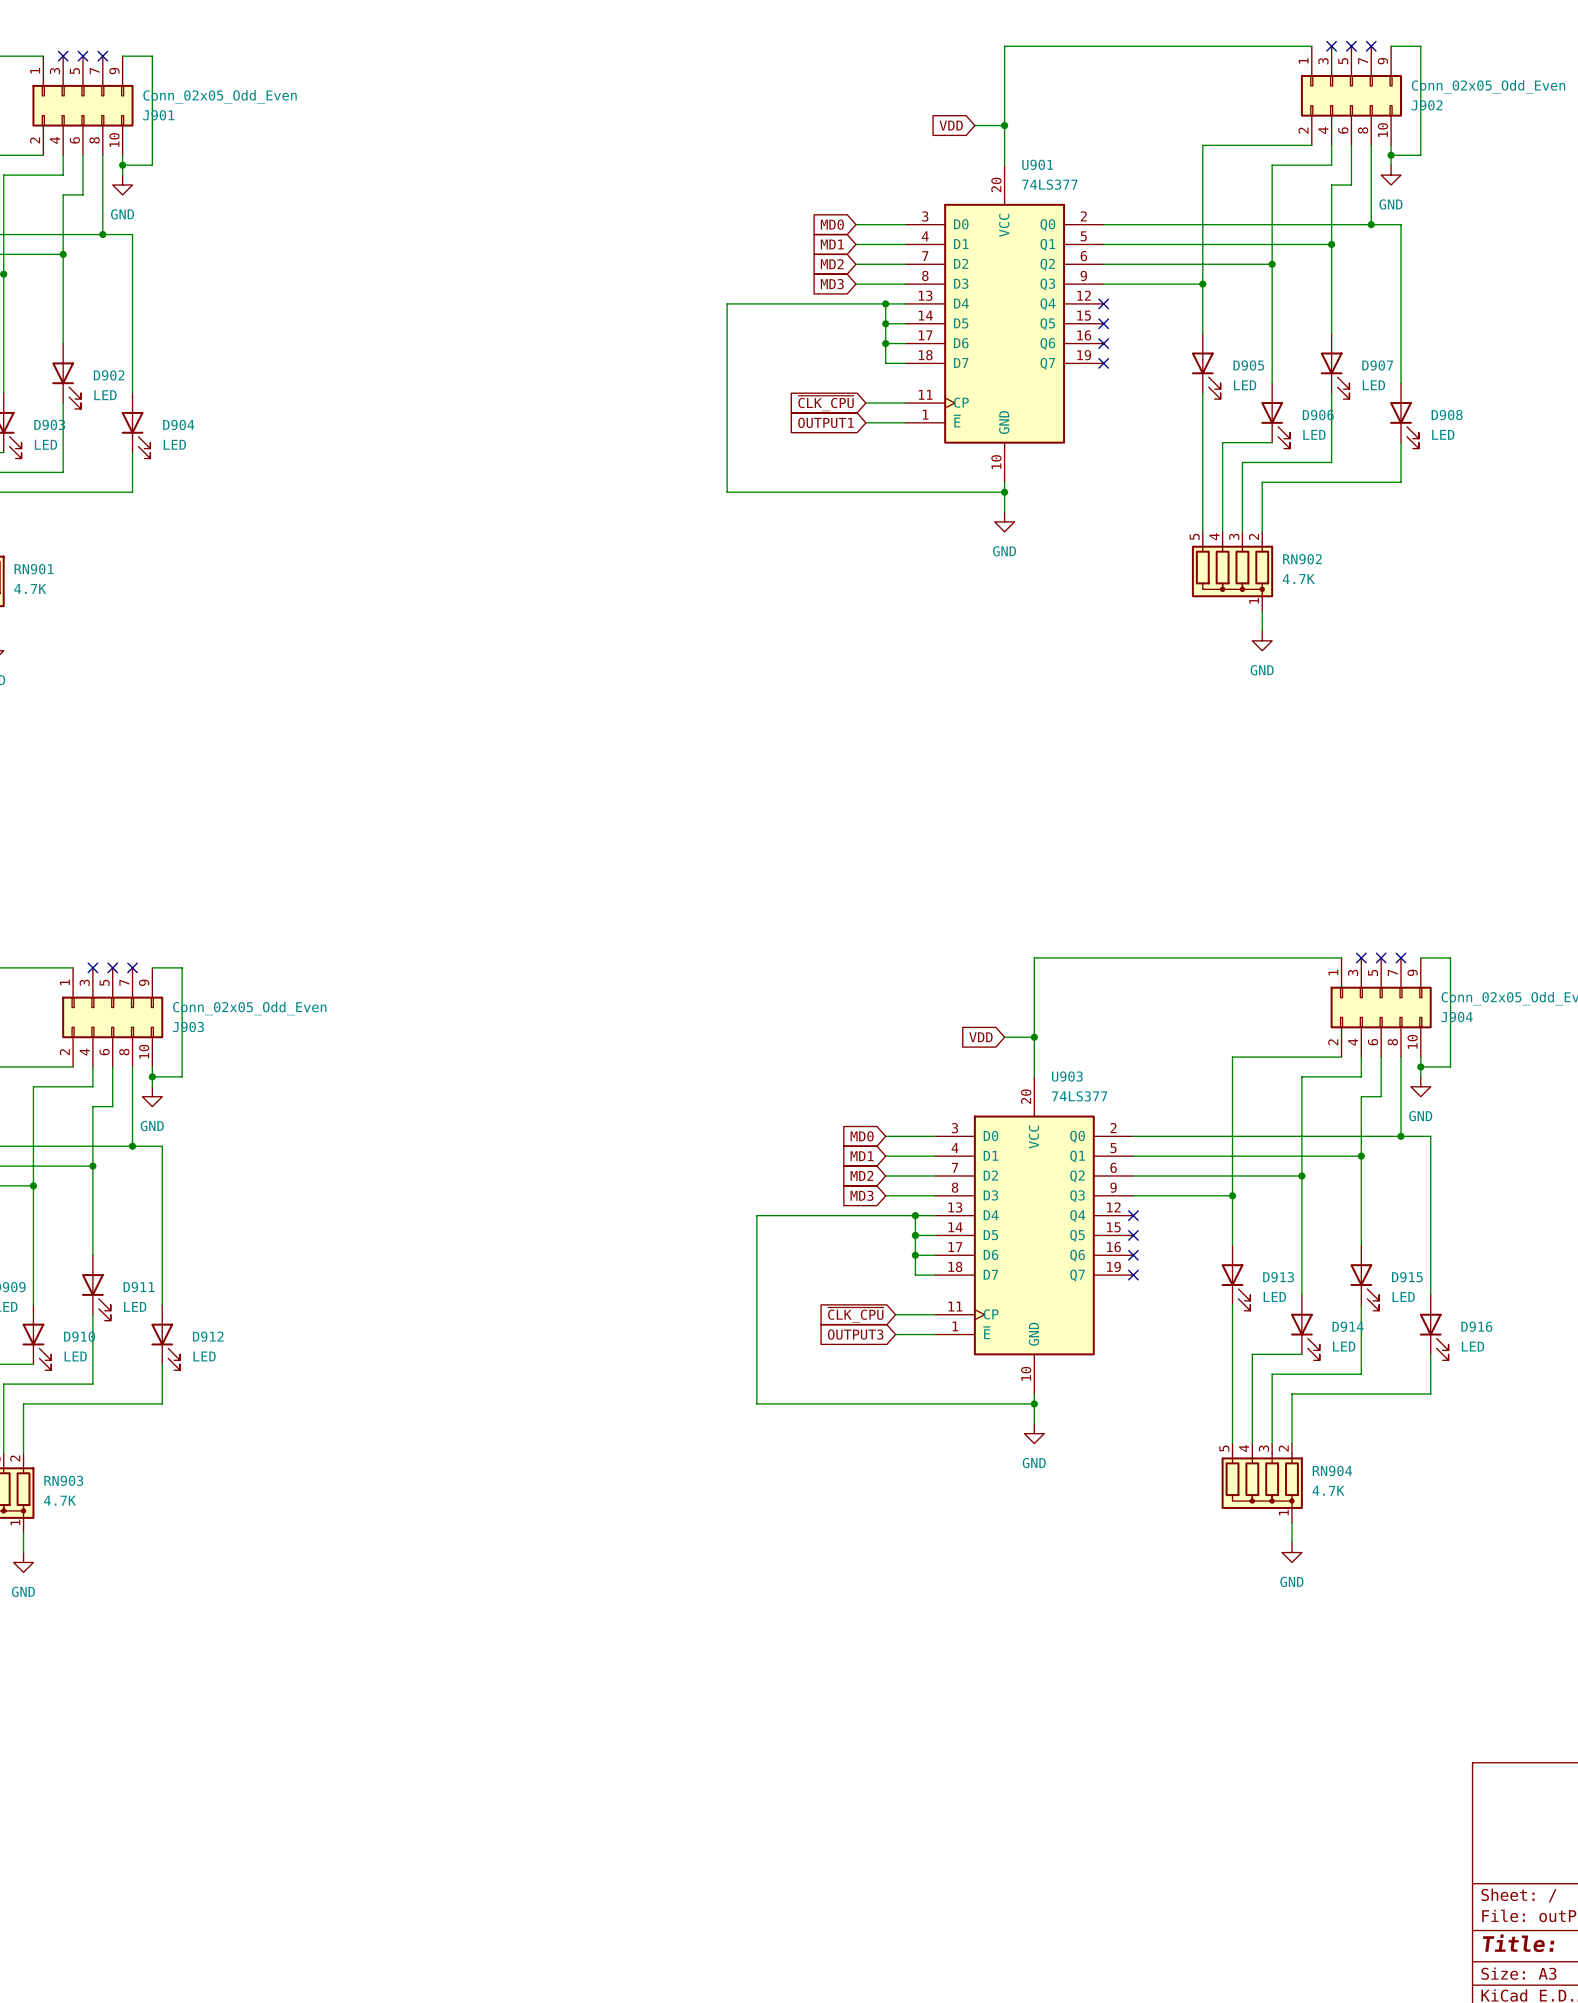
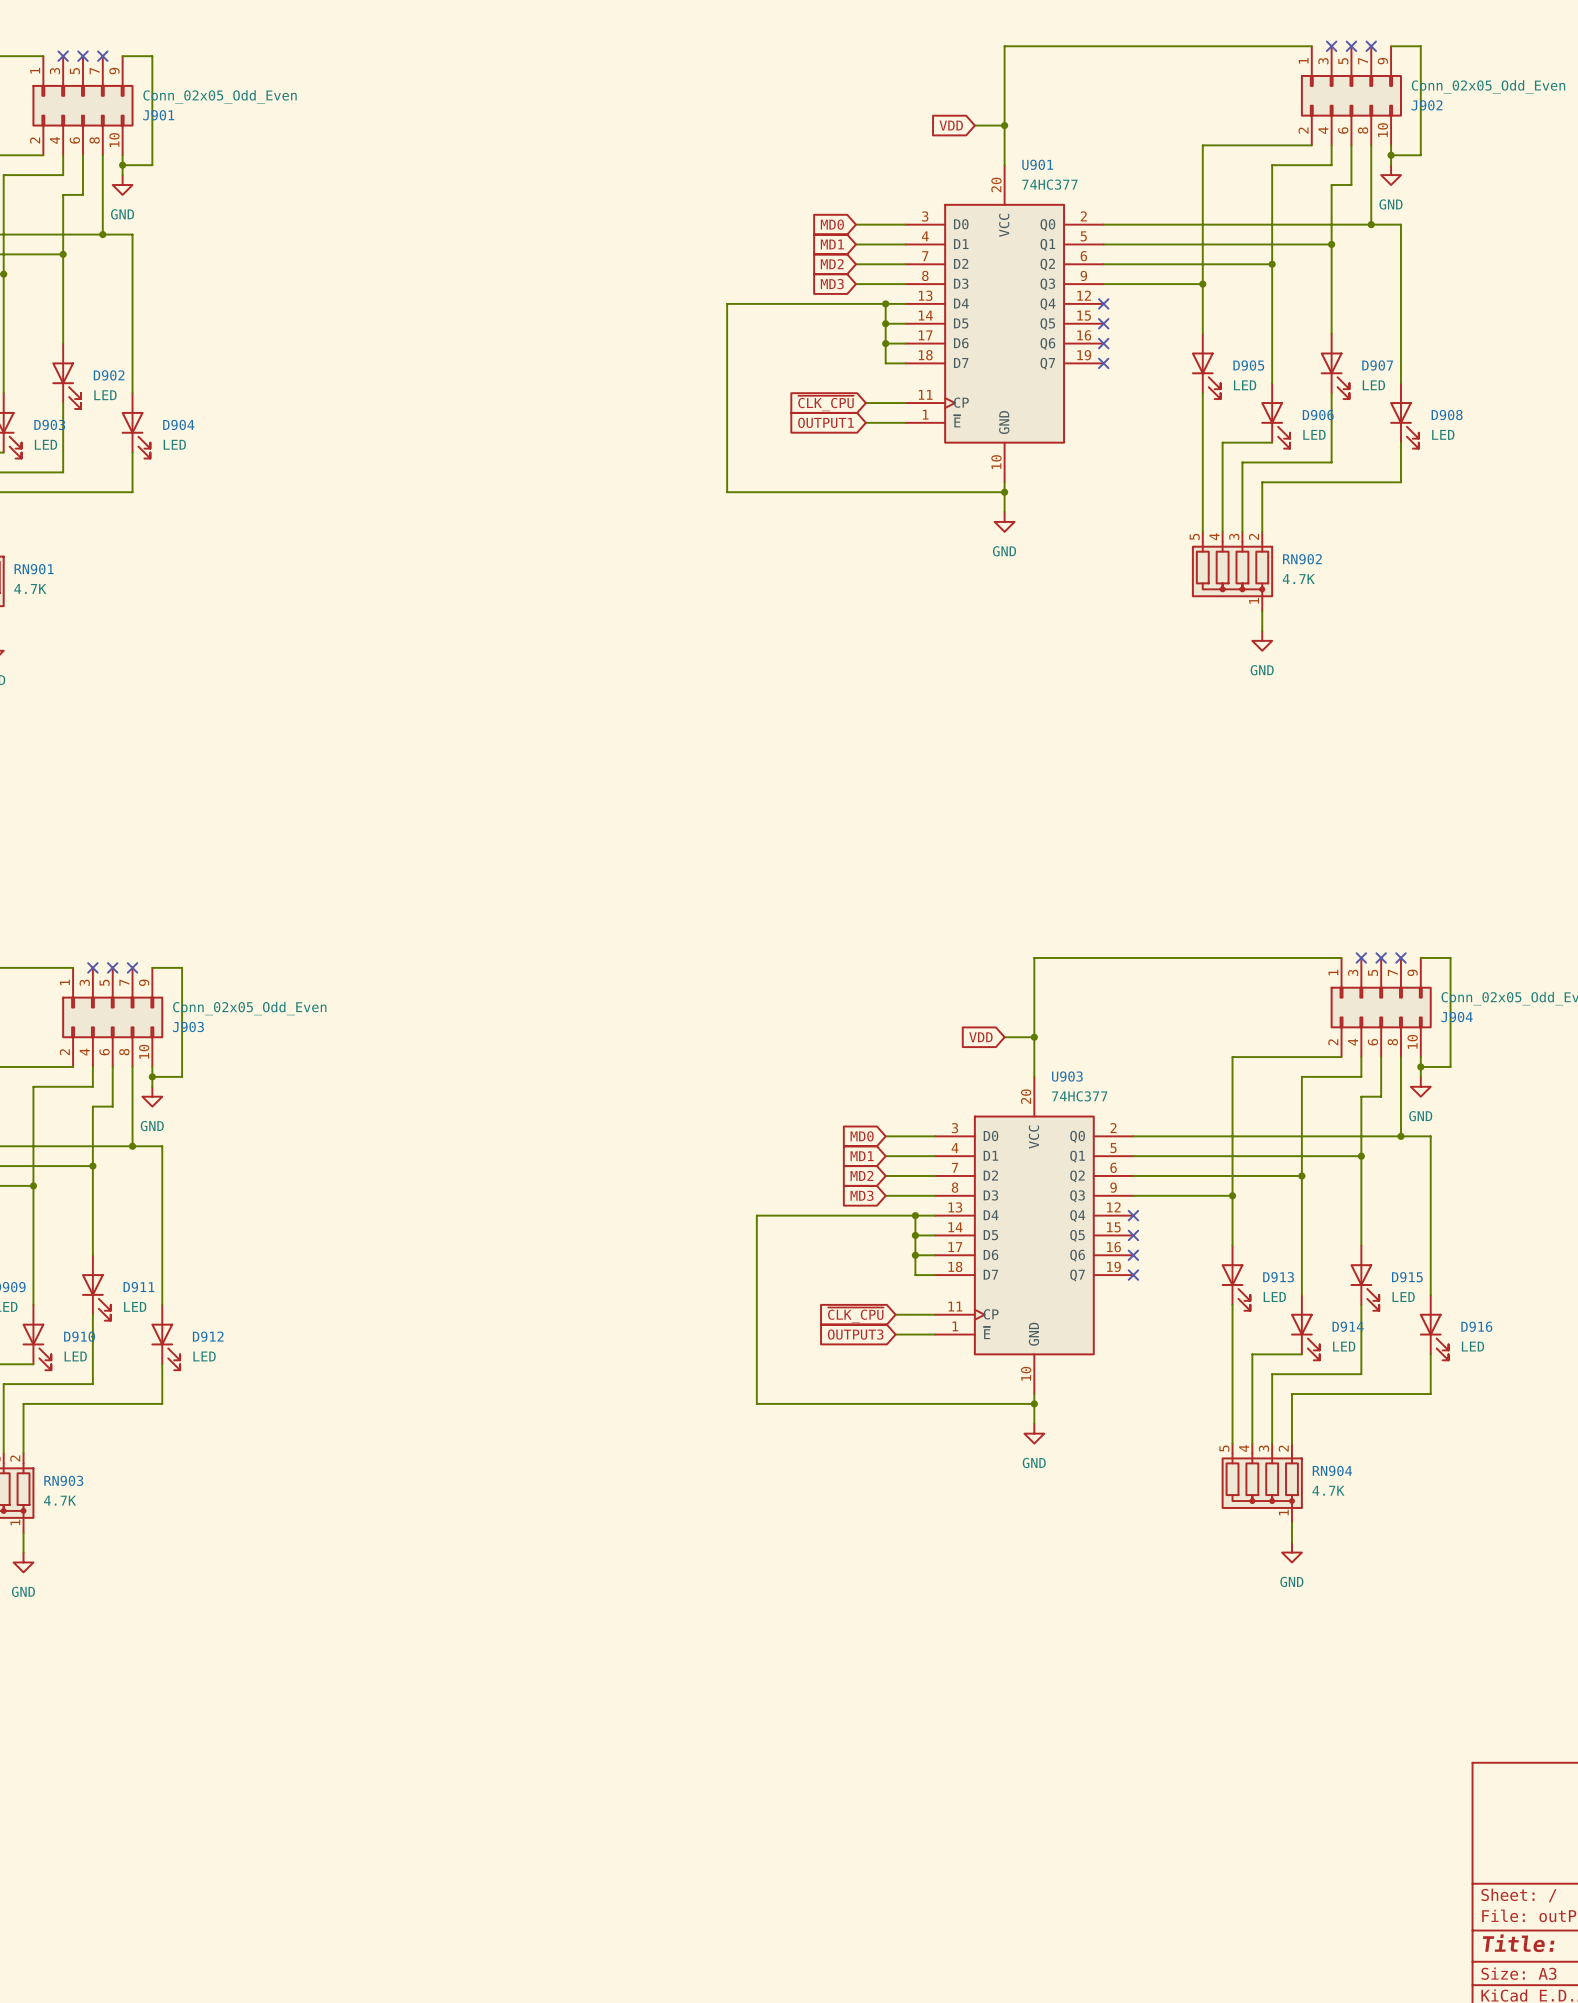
U901 value: 74LS377 (1049, 184) -> 74HC377 (1049, 184)
U903 value: 74LS377 (1079, 1096) -> 74HC377 (1079, 1096)

